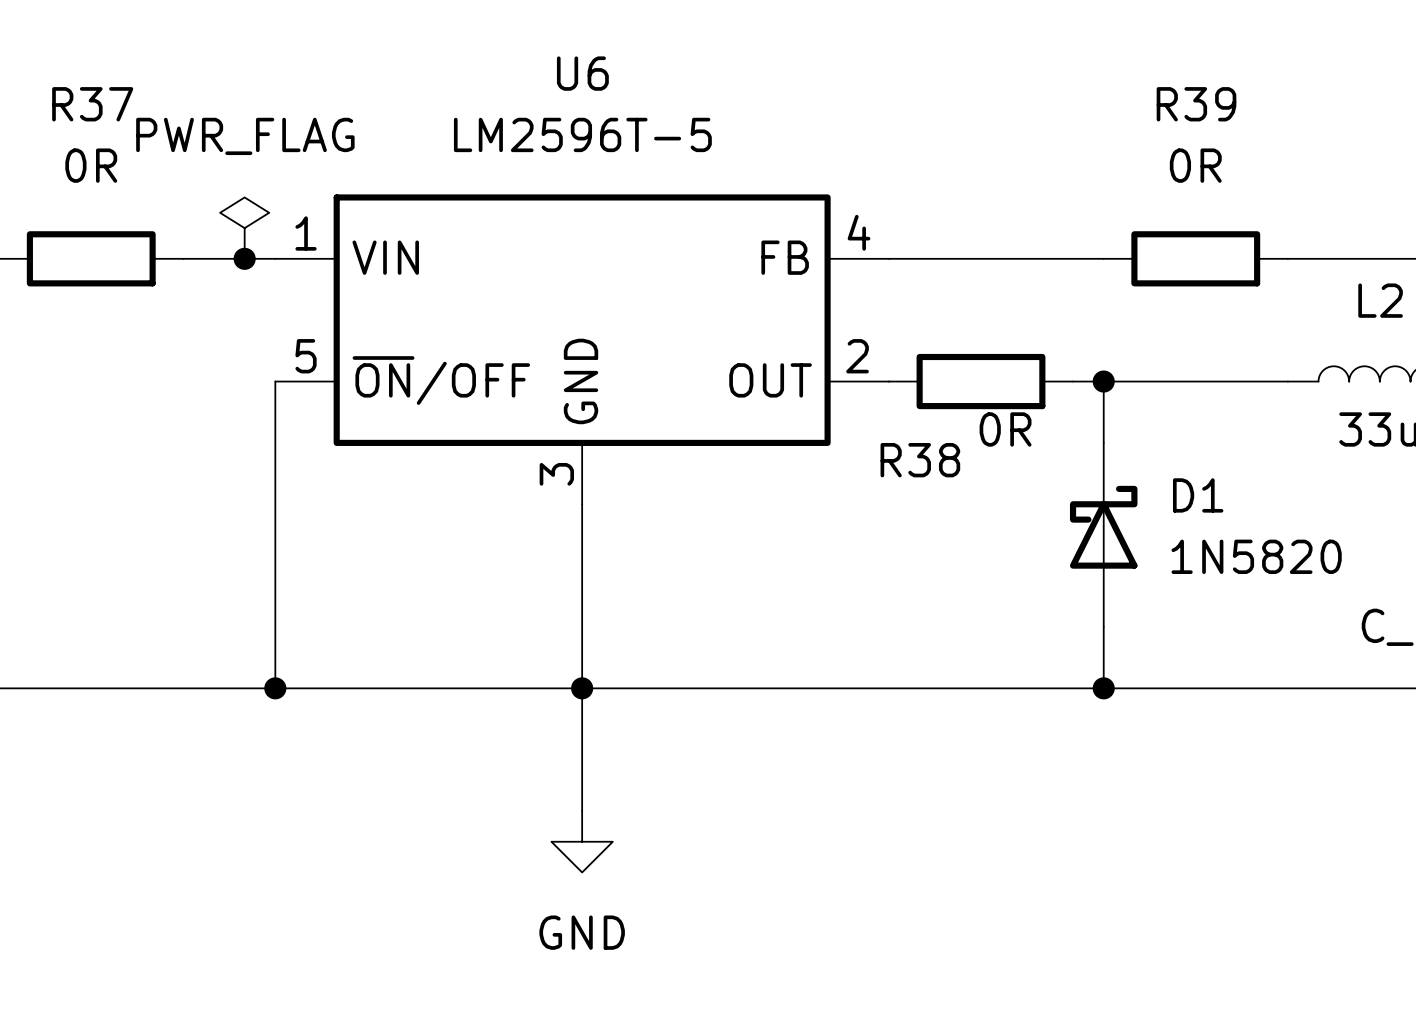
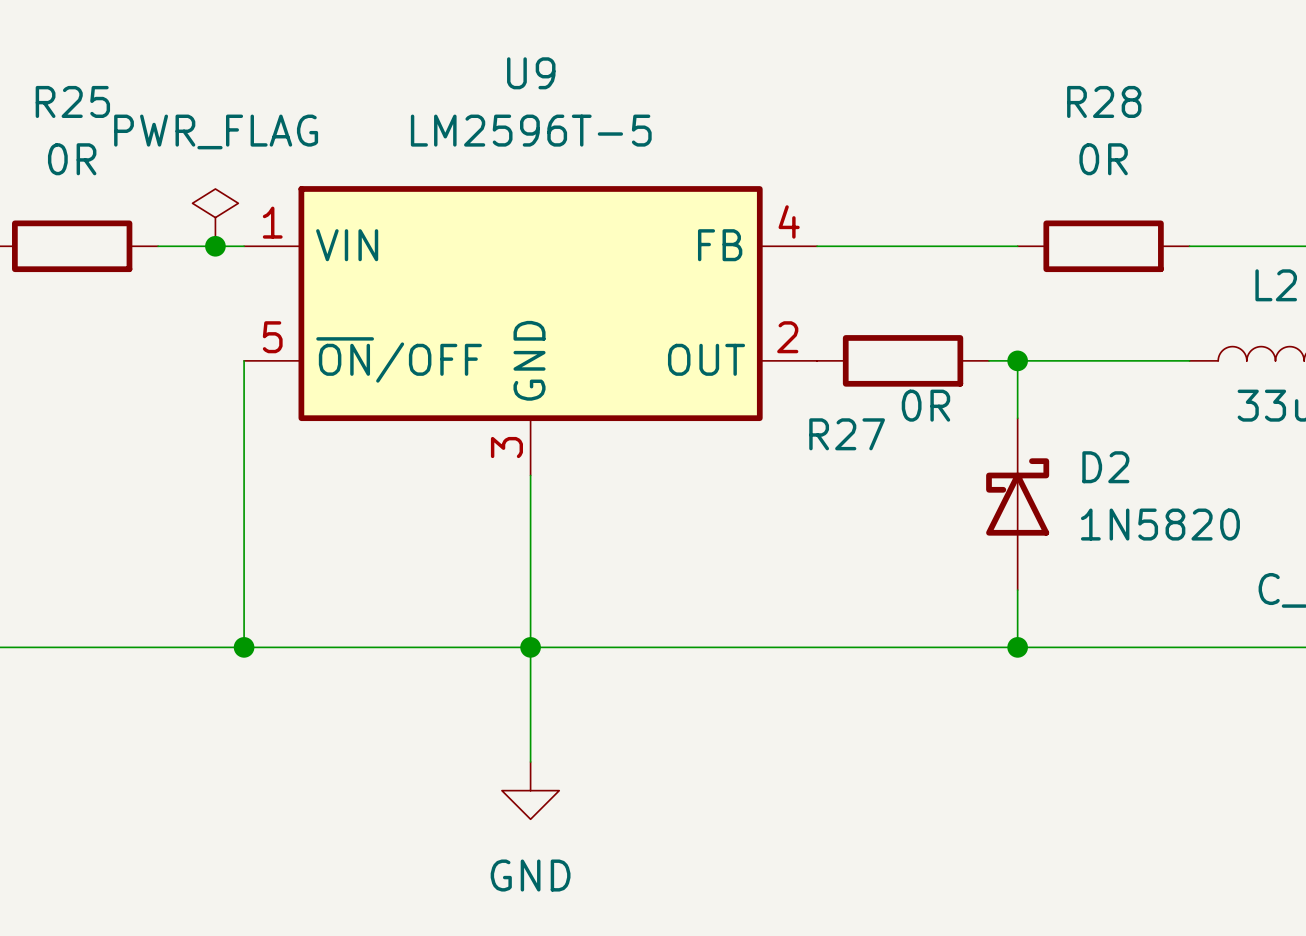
U6 name: U6 (582, 73) -> U9 (531, 73)
R37 name: R37 (92, 104) -> R25 (72, 101)
R39 name: R39 (1196, 104) -> R28 (1104, 101)
R38 name: R38 (920, 460) -> R27 (847, 434)
D1 name: D1 (1198, 495) -> D2 (1105, 467)

